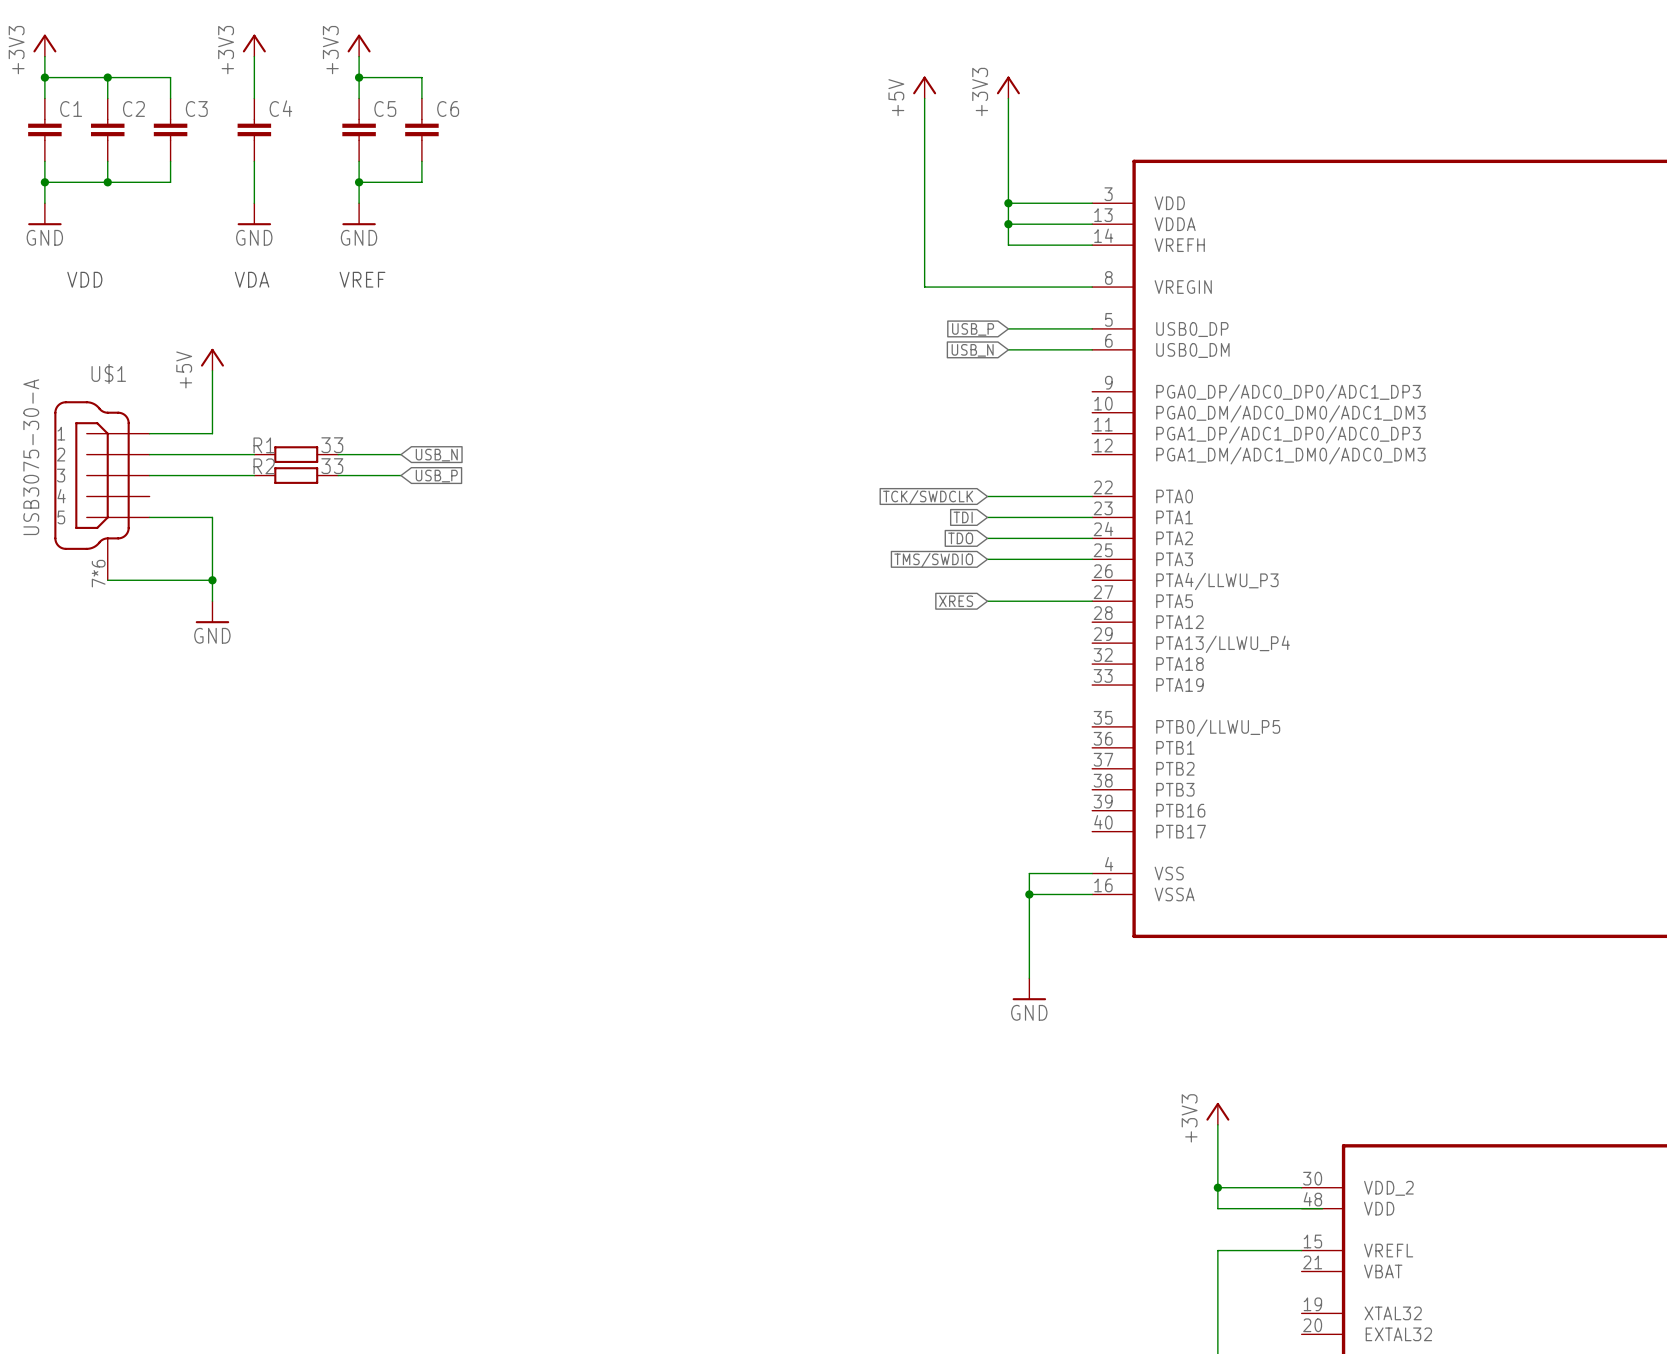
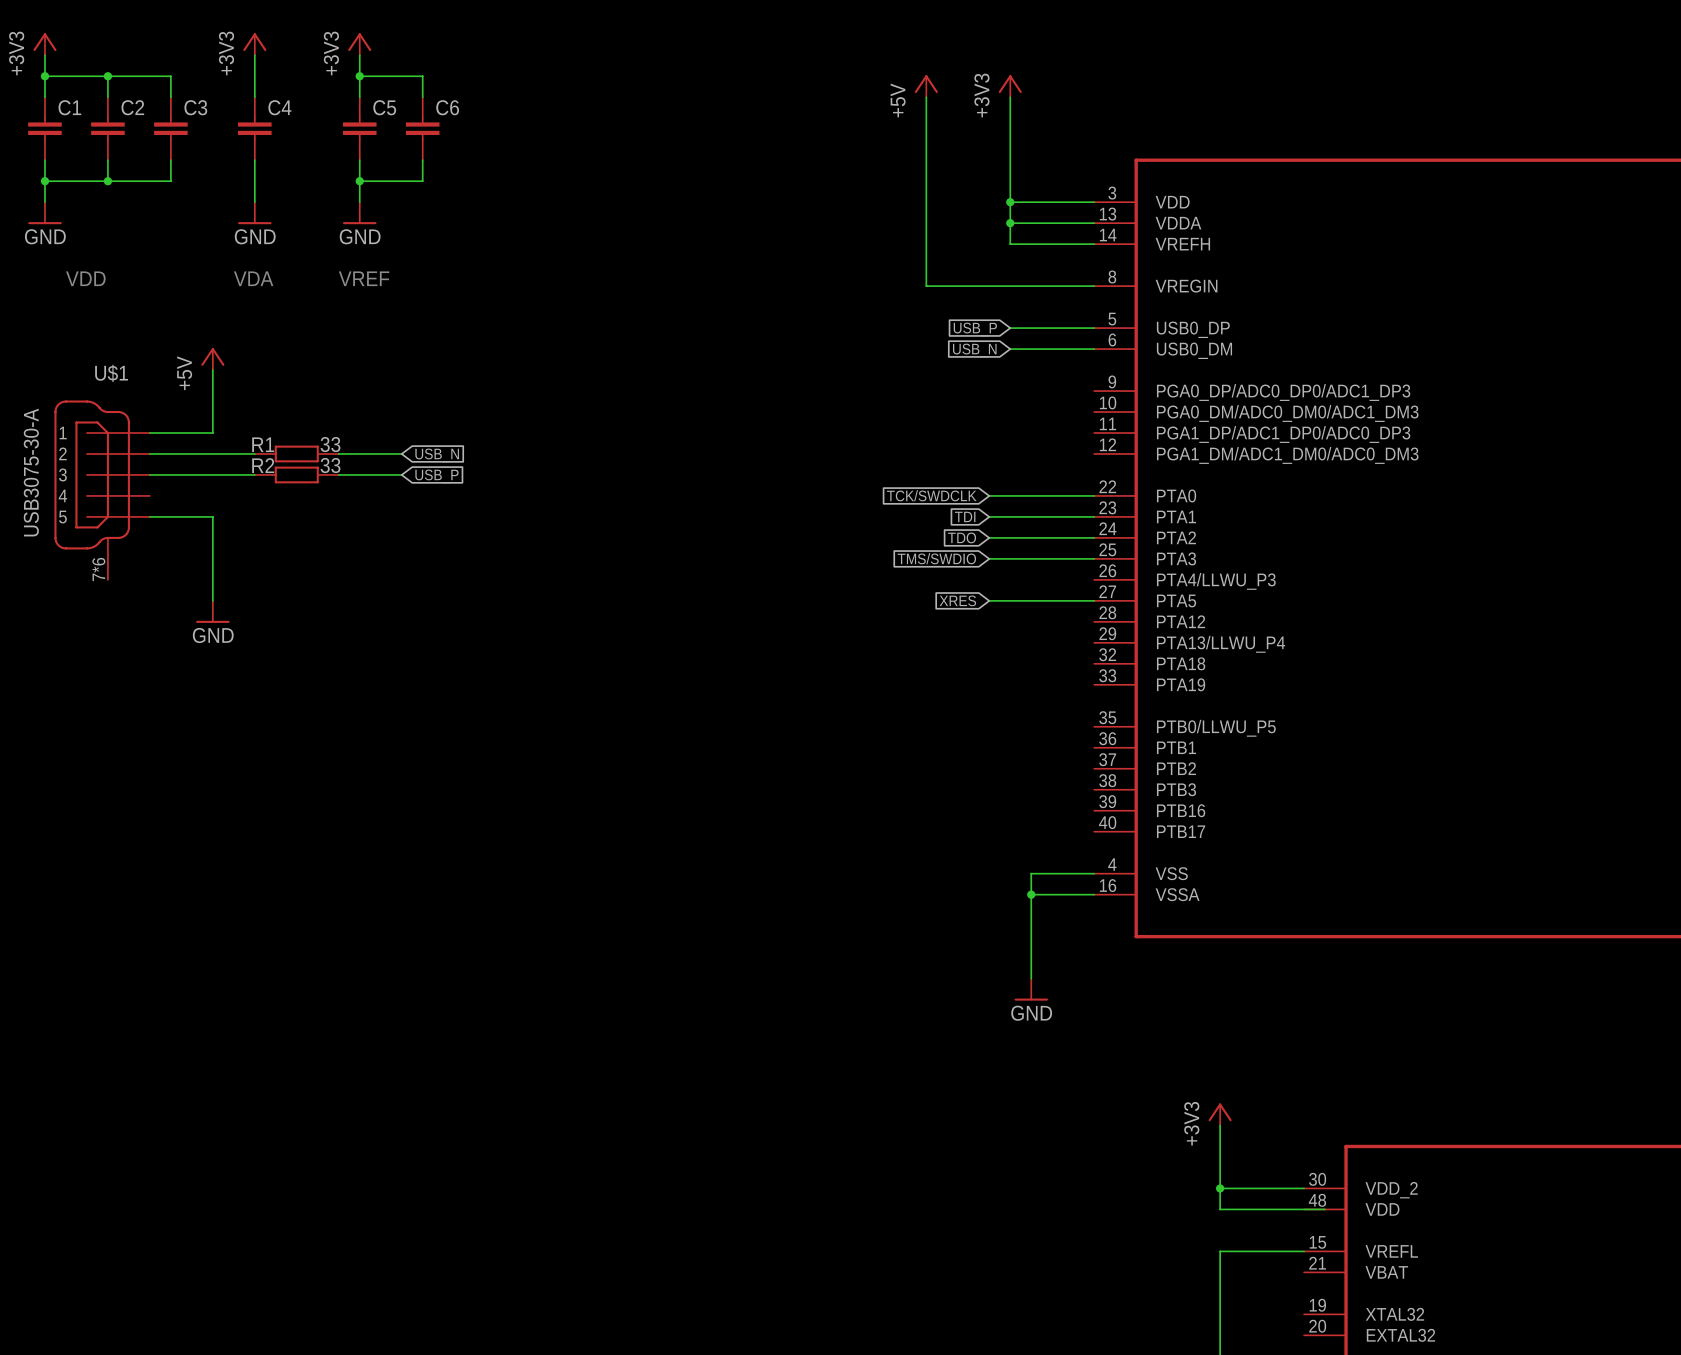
wire: (107, 580) (212, 580) -> none
junction: (212, 580) -> none

